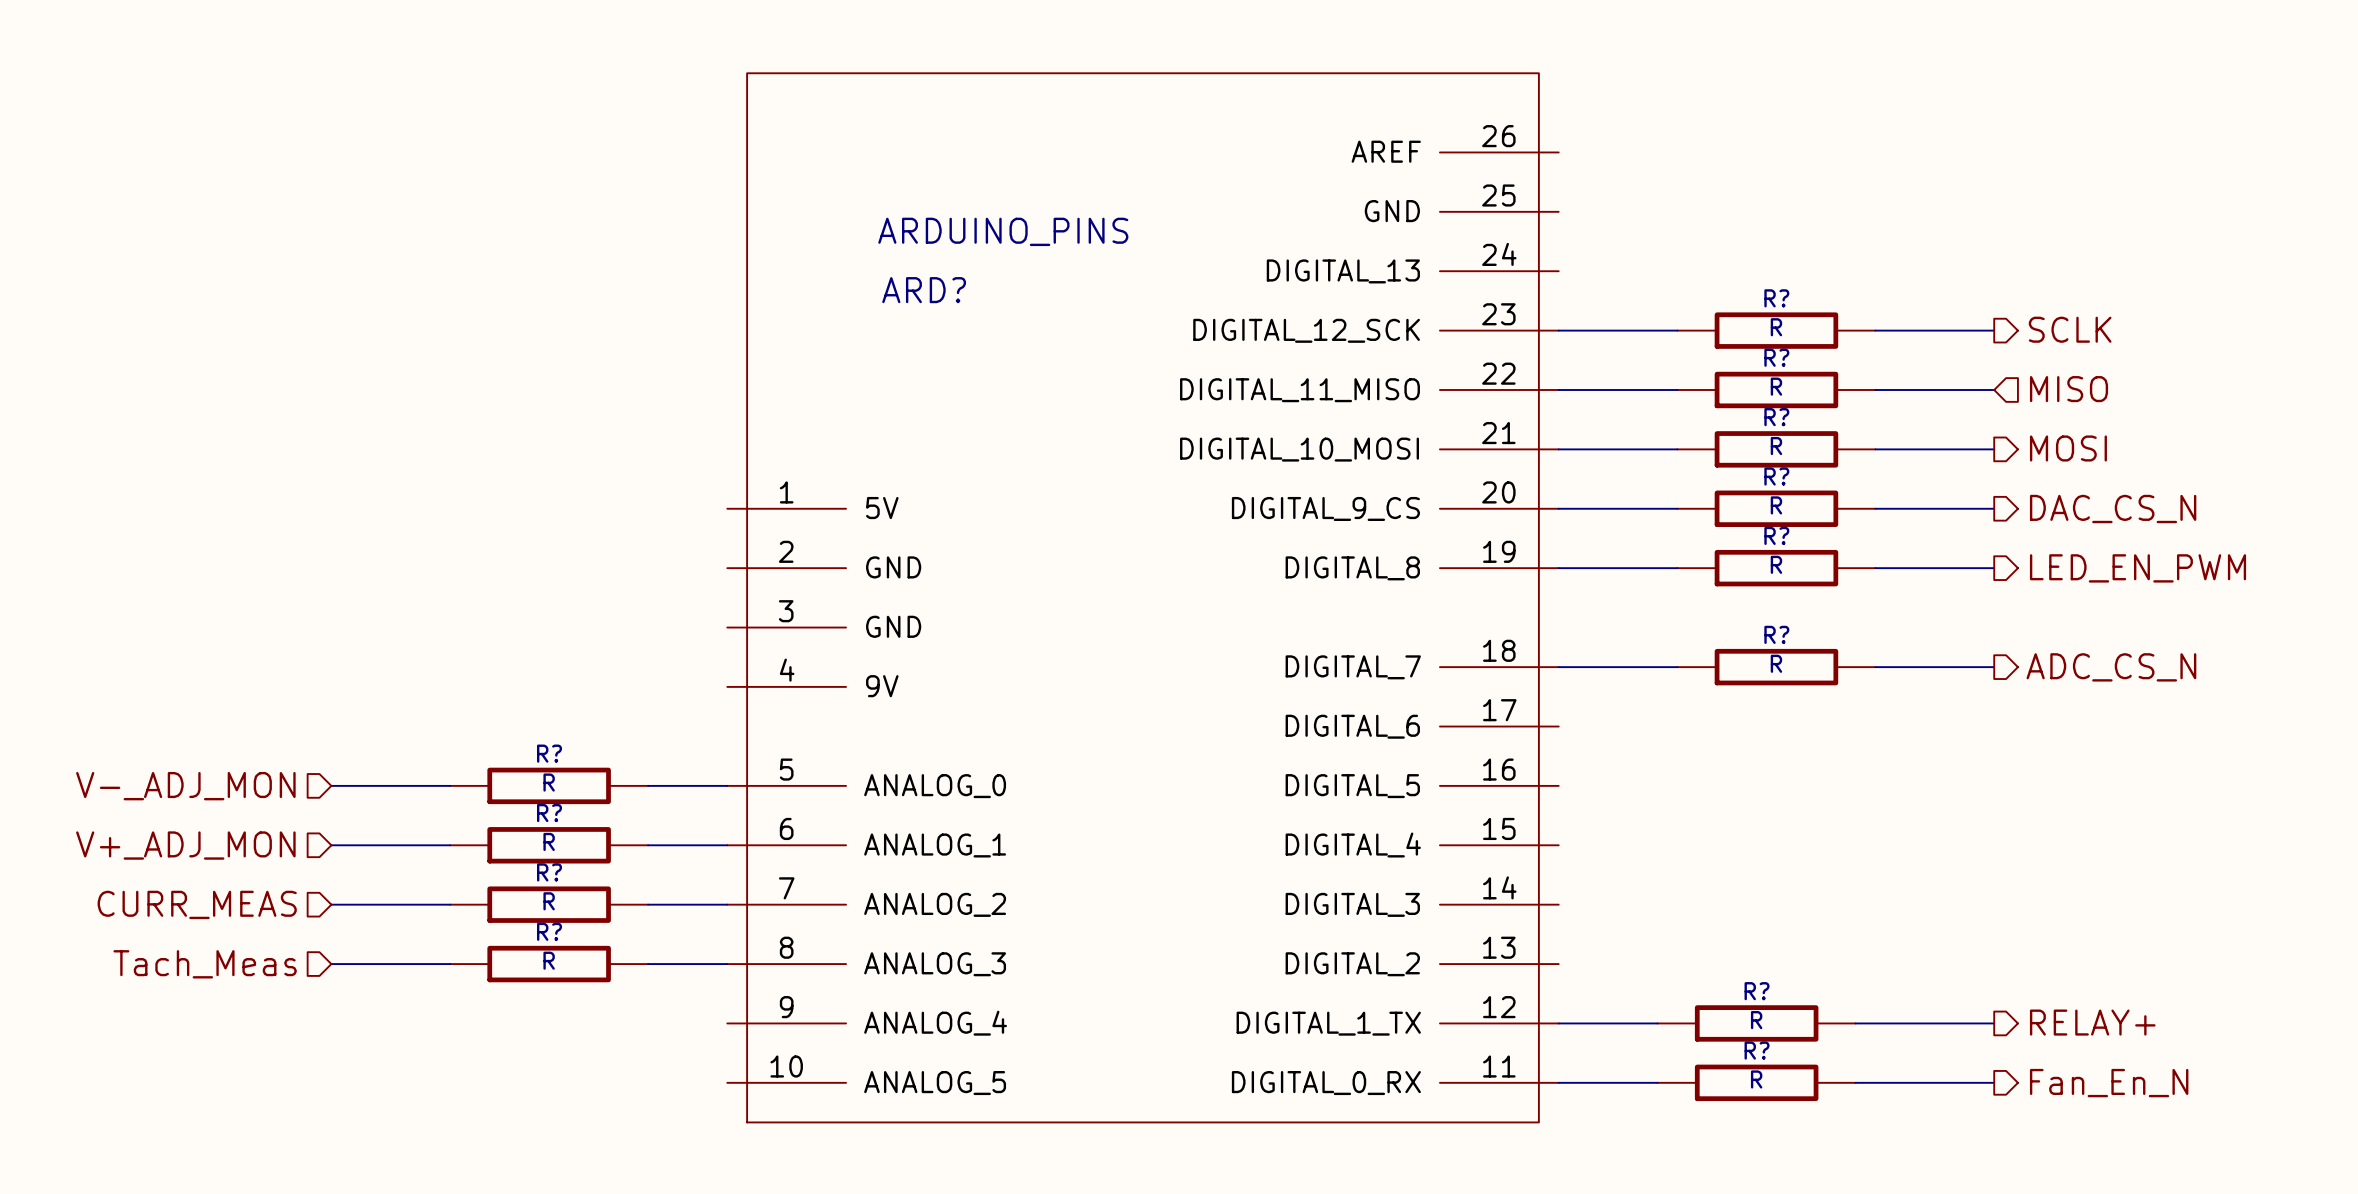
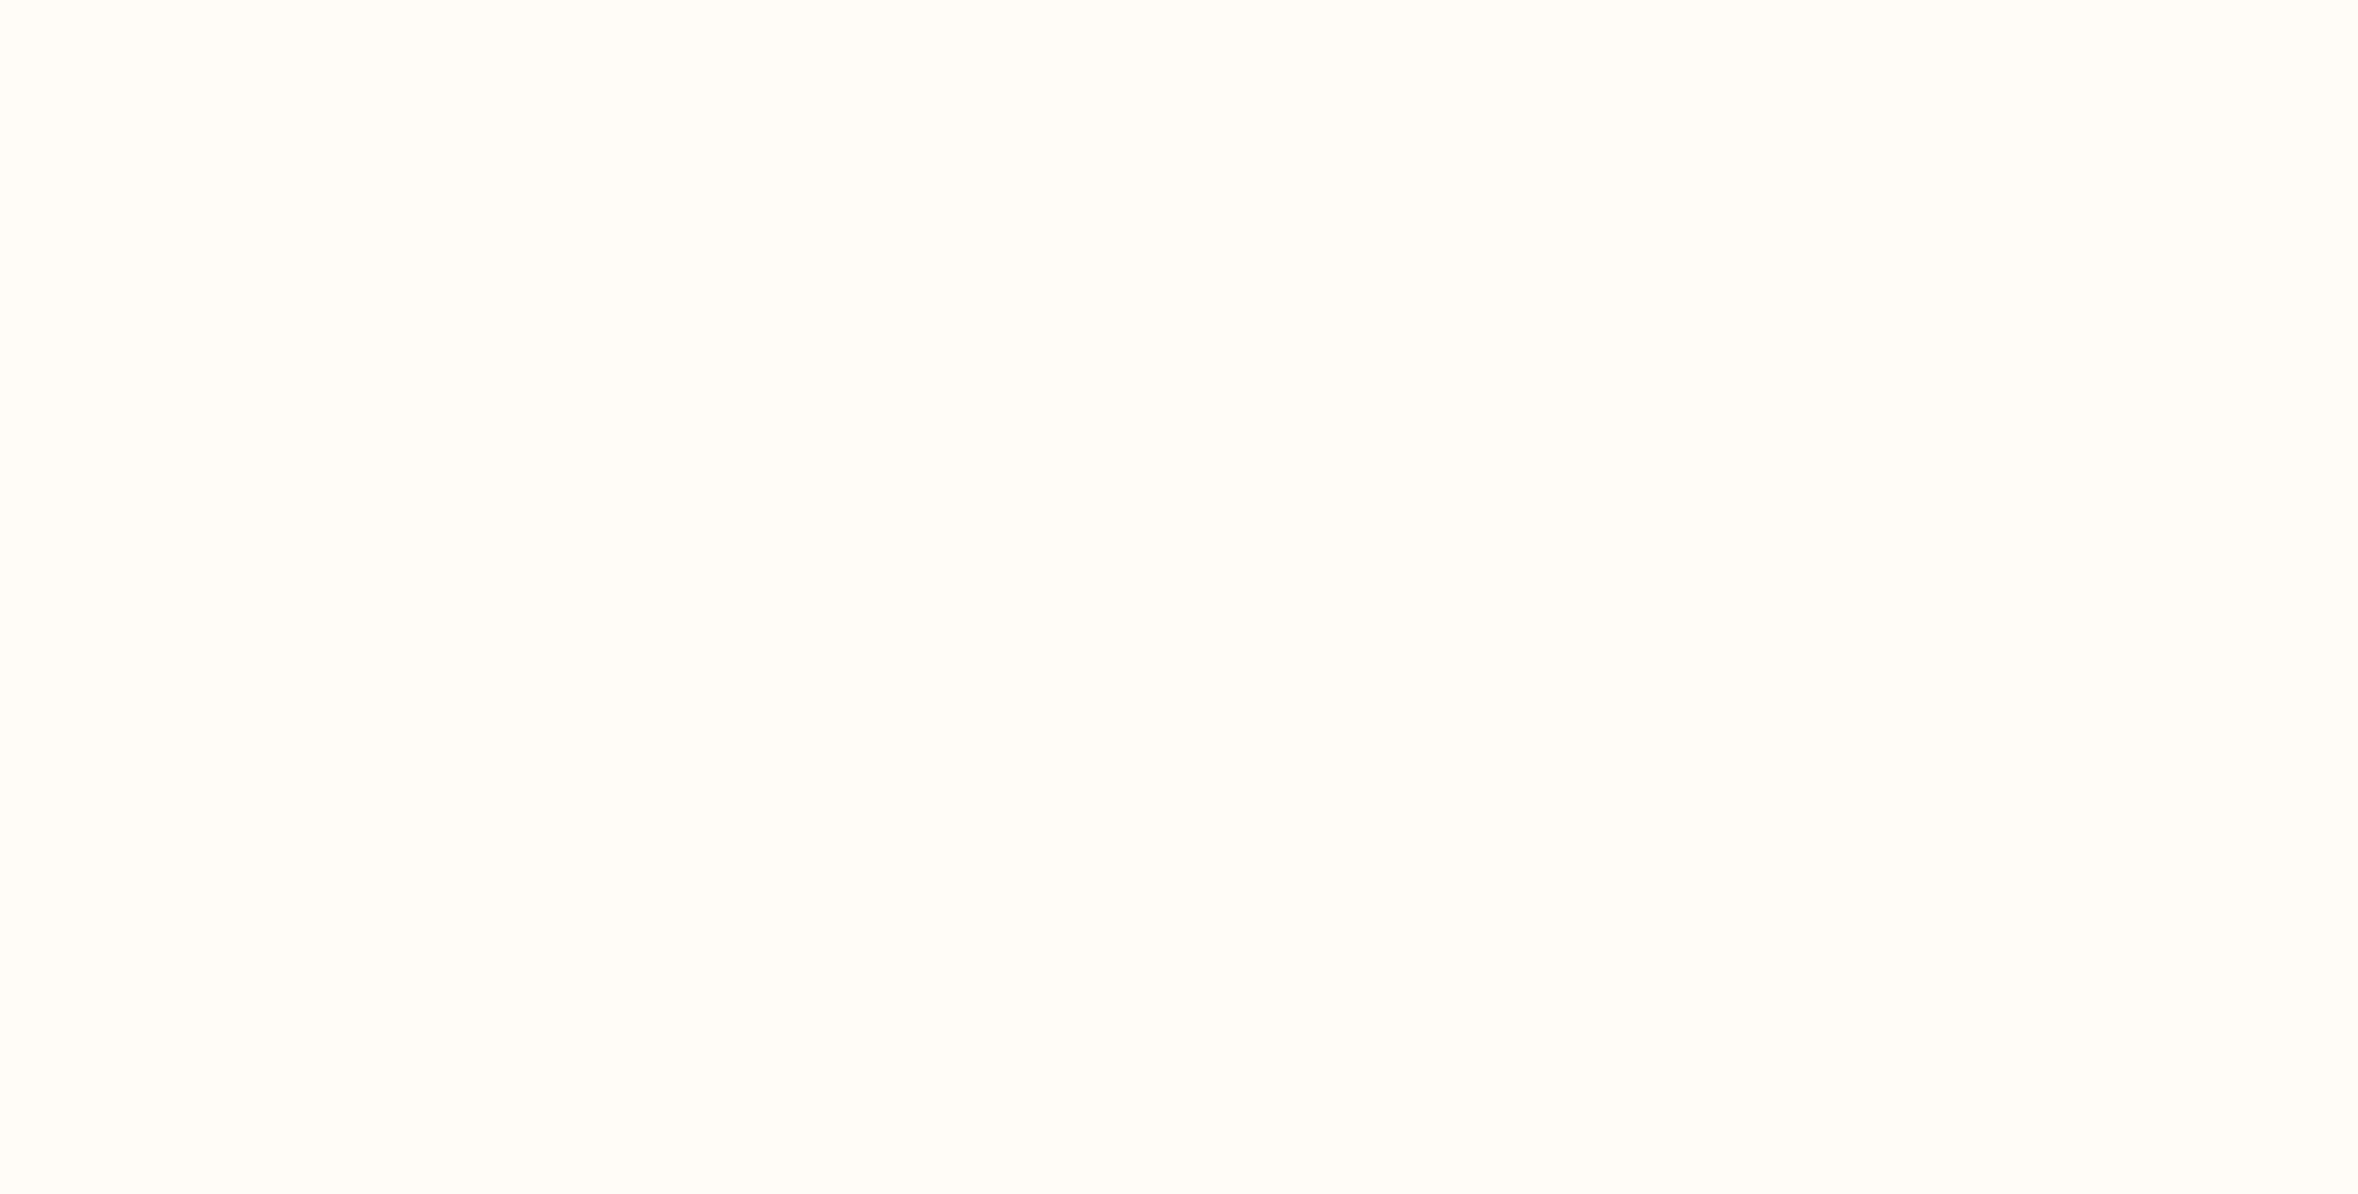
hierarchical label: SCLK (2070, 329) -> none
wire: (1558, 330) (1677, 330) -> none
R?: R (1776, 330) -> none
wire: (1875, 330) (1994, 330) -> none
wire: (1558, 389) (1677, 389) -> none
R?: R (1776, 389) -> none
wire: (1875, 389) (1994, 389) -> none
hierarchical label: MISO (2069, 389) -> none
hierarchical label: MOSI (2068, 448) -> none
wire: (1558, 449) (1677, 449) -> none
R?: R (1776, 449) -> none
wire: (1875, 449) (1994, 449) -> none
wire: (1558, 508) (1677, 508) -> none
R?: R (1776, 508) -> none
wire: (1875, 508) (1994, 508) -> none
hierarchical label: DAC_CS_N (2113, 509) -> none
wire: (1558, 568) (1677, 568) -> none
R?: R (1776, 568) -> none
wire: (1875, 568) (1994, 568) -> none
hierarchical label: LED_EN_PWM (2138, 568) -> none
ARD?: ARDUINO_PINS (1143, 597) -> none
wire: (1558, 667) (1677, 667) -> none
R?: R (1776, 667) -> none
wire: (1875, 667) (1994, 667) -> none
hierarchical label: ADC_CS_N (2111, 667) -> none
wire: (331, 785) (450, 785) -> none
R?: R (549, 785) -> none
wire: (648, 785) (727, 785) -> none
hierarchical label: V-_ADJ_MON (185, 786) -> none
hierarchical label: V+_ADJ_MON (185, 845) -> none
wire: (331, 845) (450, 845) -> none
R?: R (549, 845) -> none
wire: (648, 845) (727, 845) -> none
hierarchical label: CURR_MEAS (197, 904) -> none
wire: (331, 904) (450, 904) -> none
R?: R (549, 904) -> none
wire: (648, 904) (727, 904) -> none
hierarchical label: Tach_Meas (205, 964) -> none
wire: (331, 964) (450, 964) -> none
R?: R (549, 964) -> none
wire: (648, 964) (727, 964) -> none
hierarchical label: RELAY+ (2092, 1022) -> none
wire: (1558, 1023) (1657, 1023) -> none
R?: R (1756, 1023) -> none
wire: (1855, 1023) (1994, 1023) -> none
wire: (1558, 1082) (1657, 1082) -> none
R?: R (1756, 1082) -> none
wire: (1855, 1082) (1994, 1082) -> none
hierarchical label: Fan_En_N (2109, 1083) -> none

